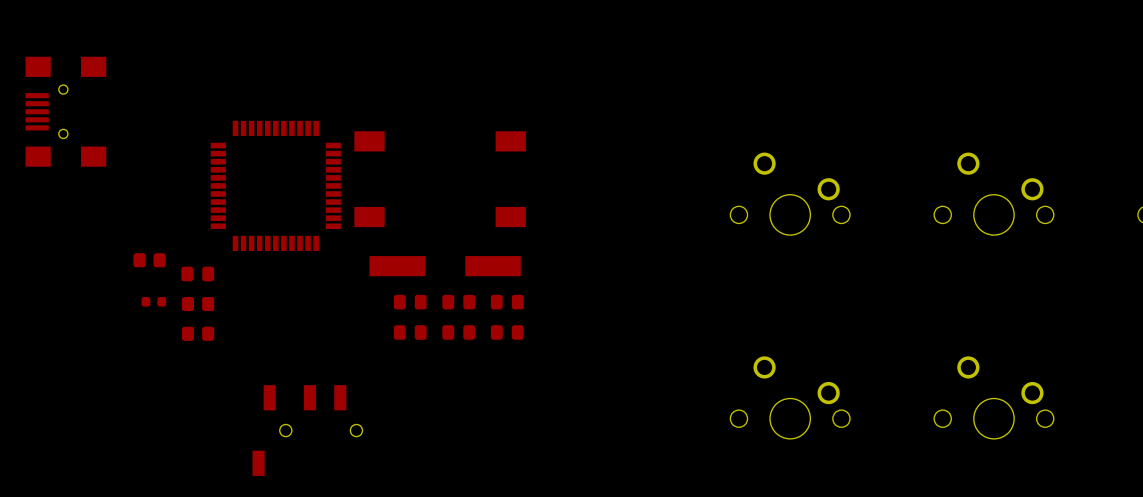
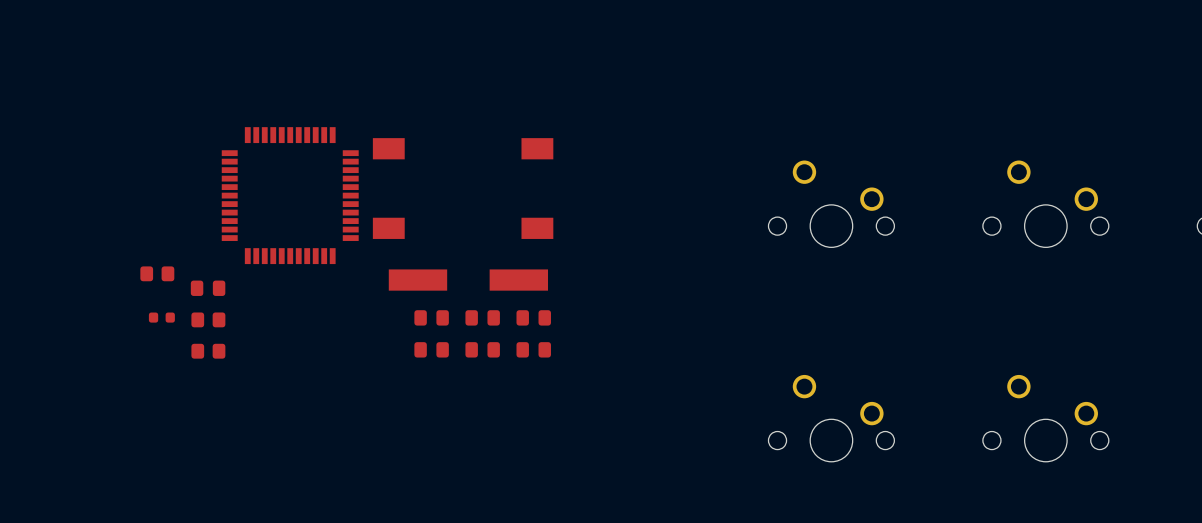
part: (65, 111) -> none
part: (307, 430) -> none

